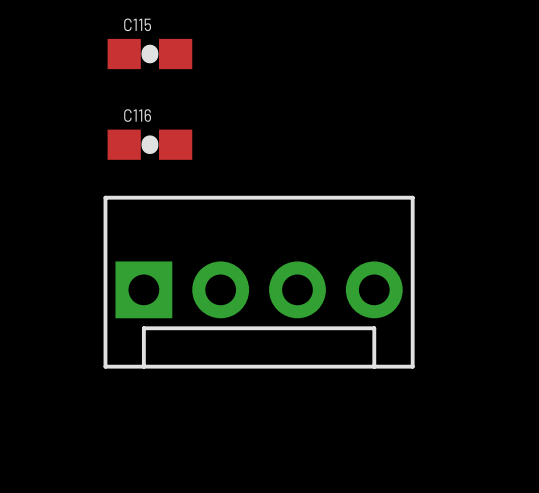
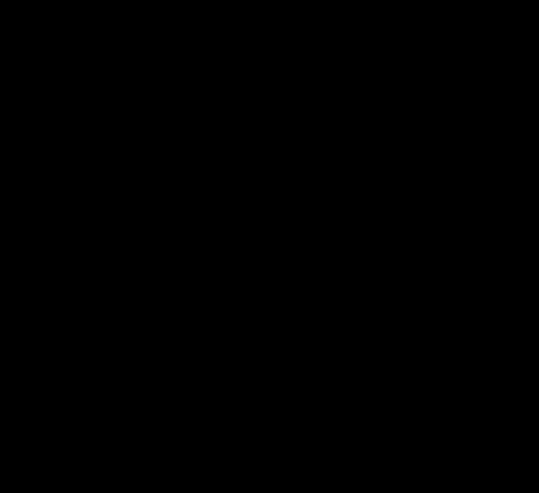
C115: (149, 54) -> none
C116: (149, 144) -> none
part: (259, 282) -> none

